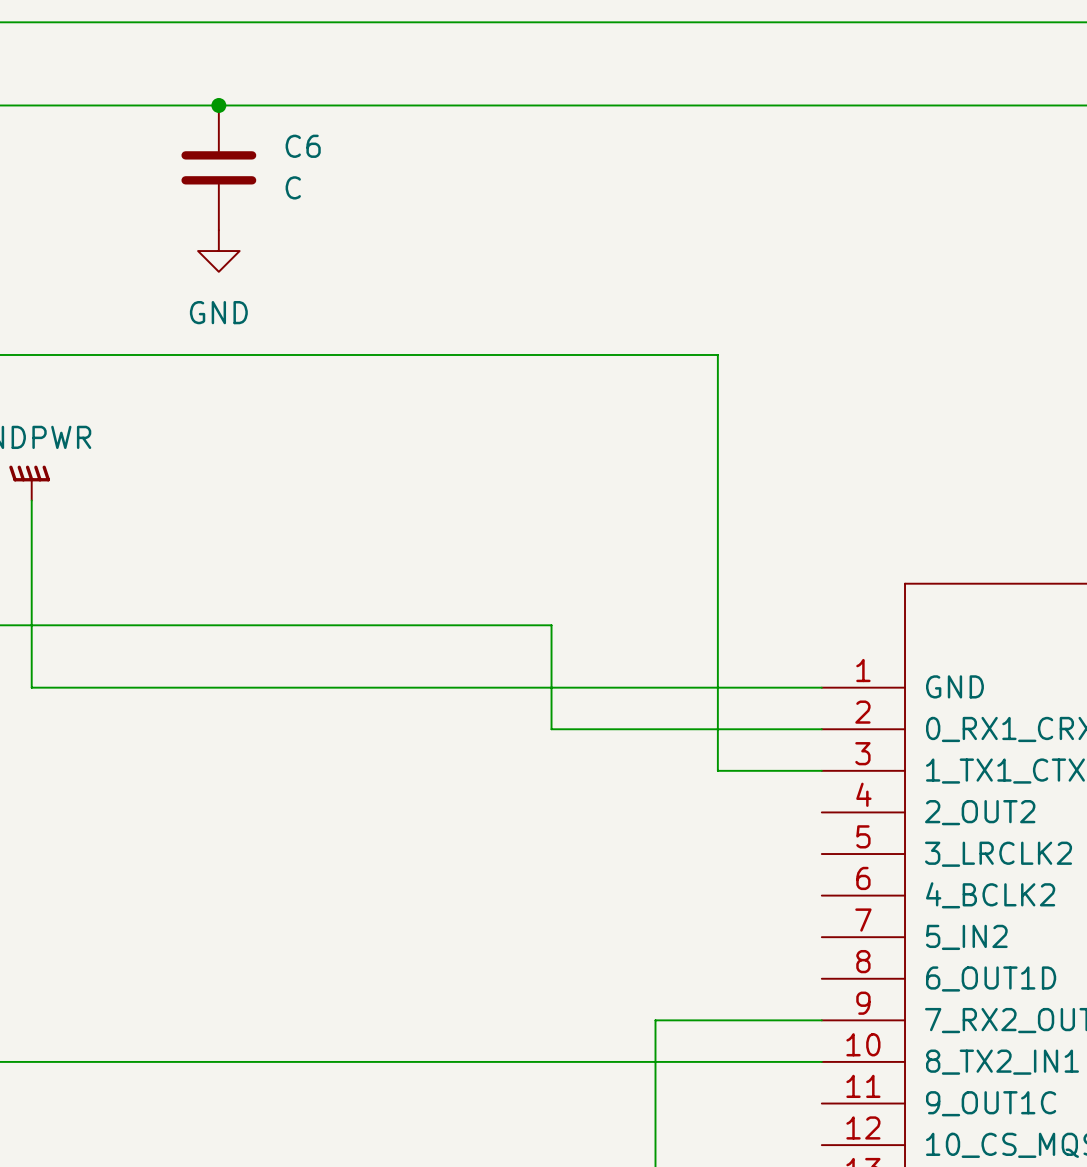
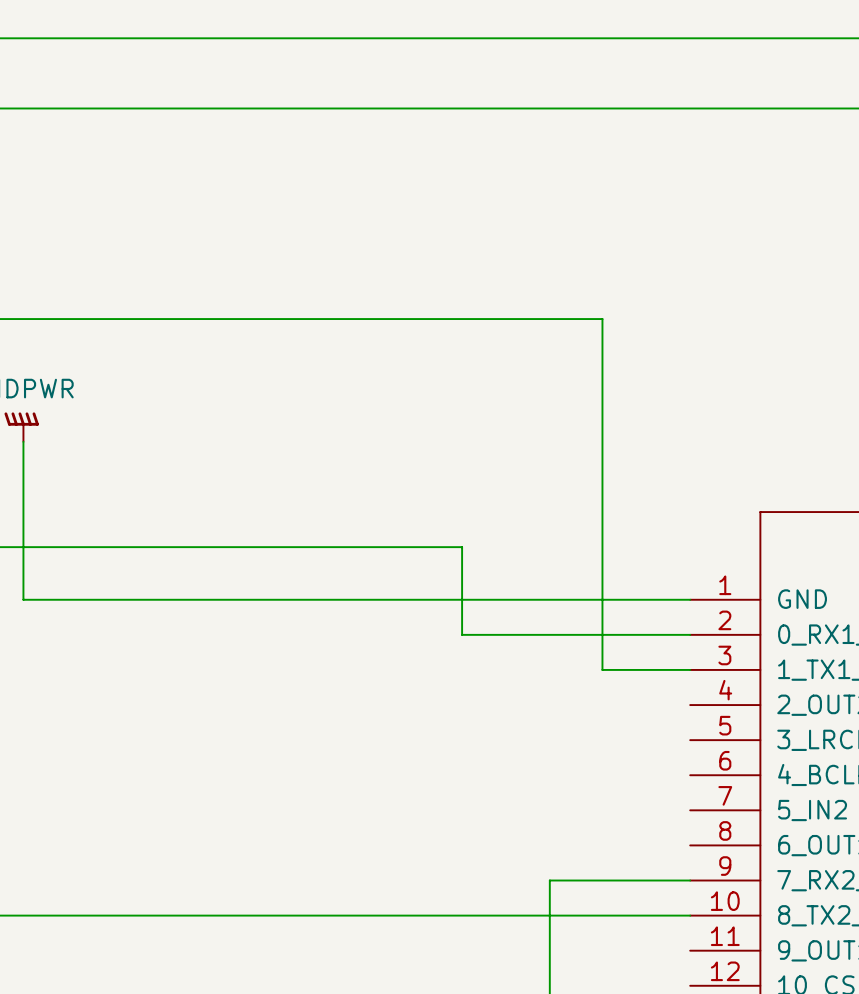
junction: (218, 105) -> none
C6: C (218, 167) -> none
power symbol: GND (218, 251) -> none

